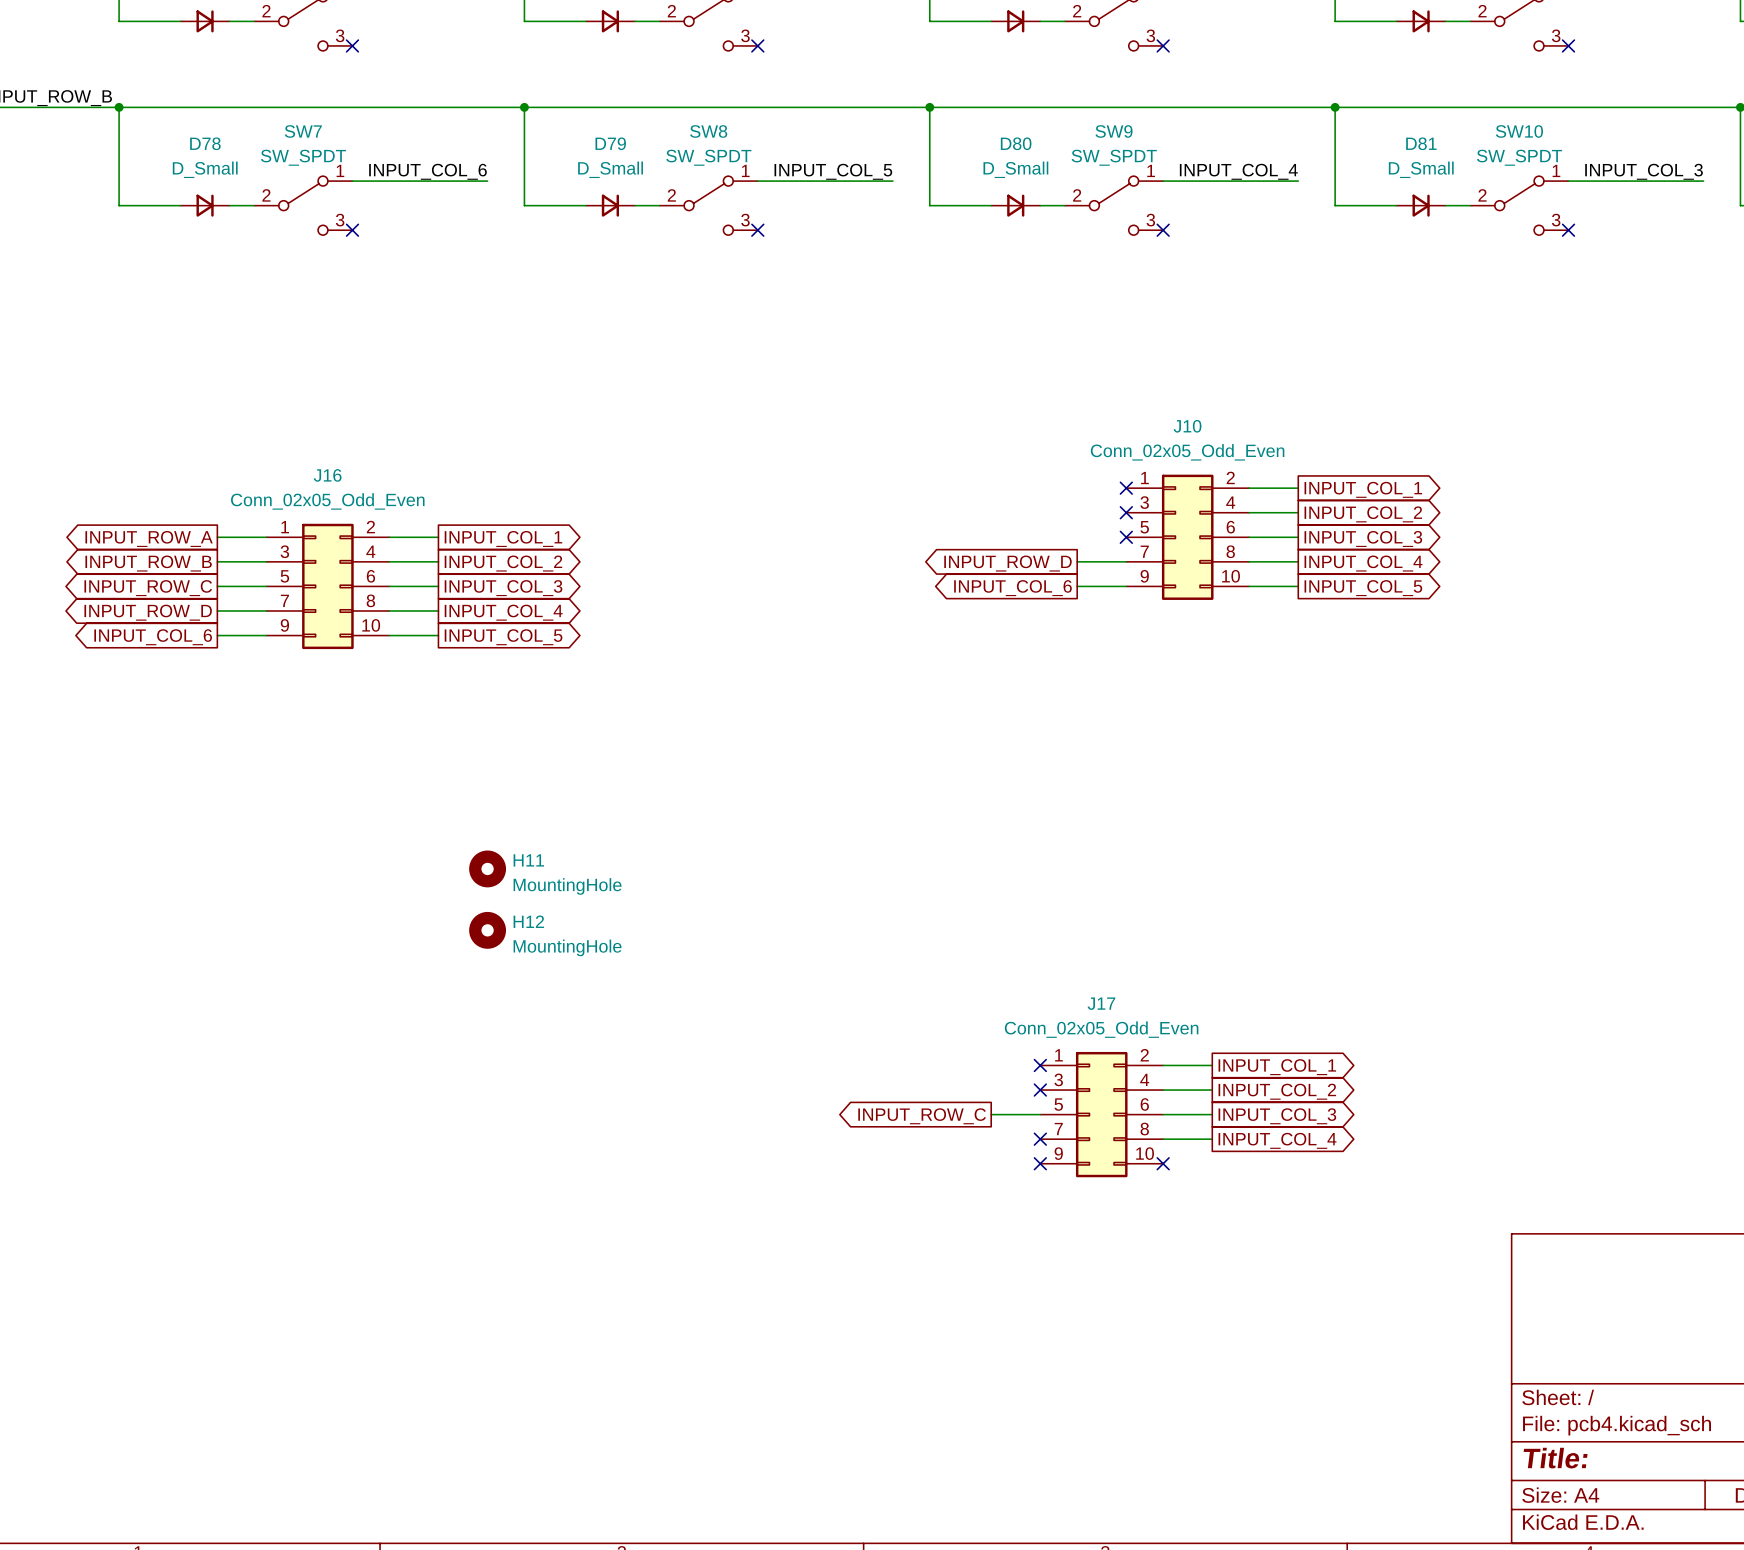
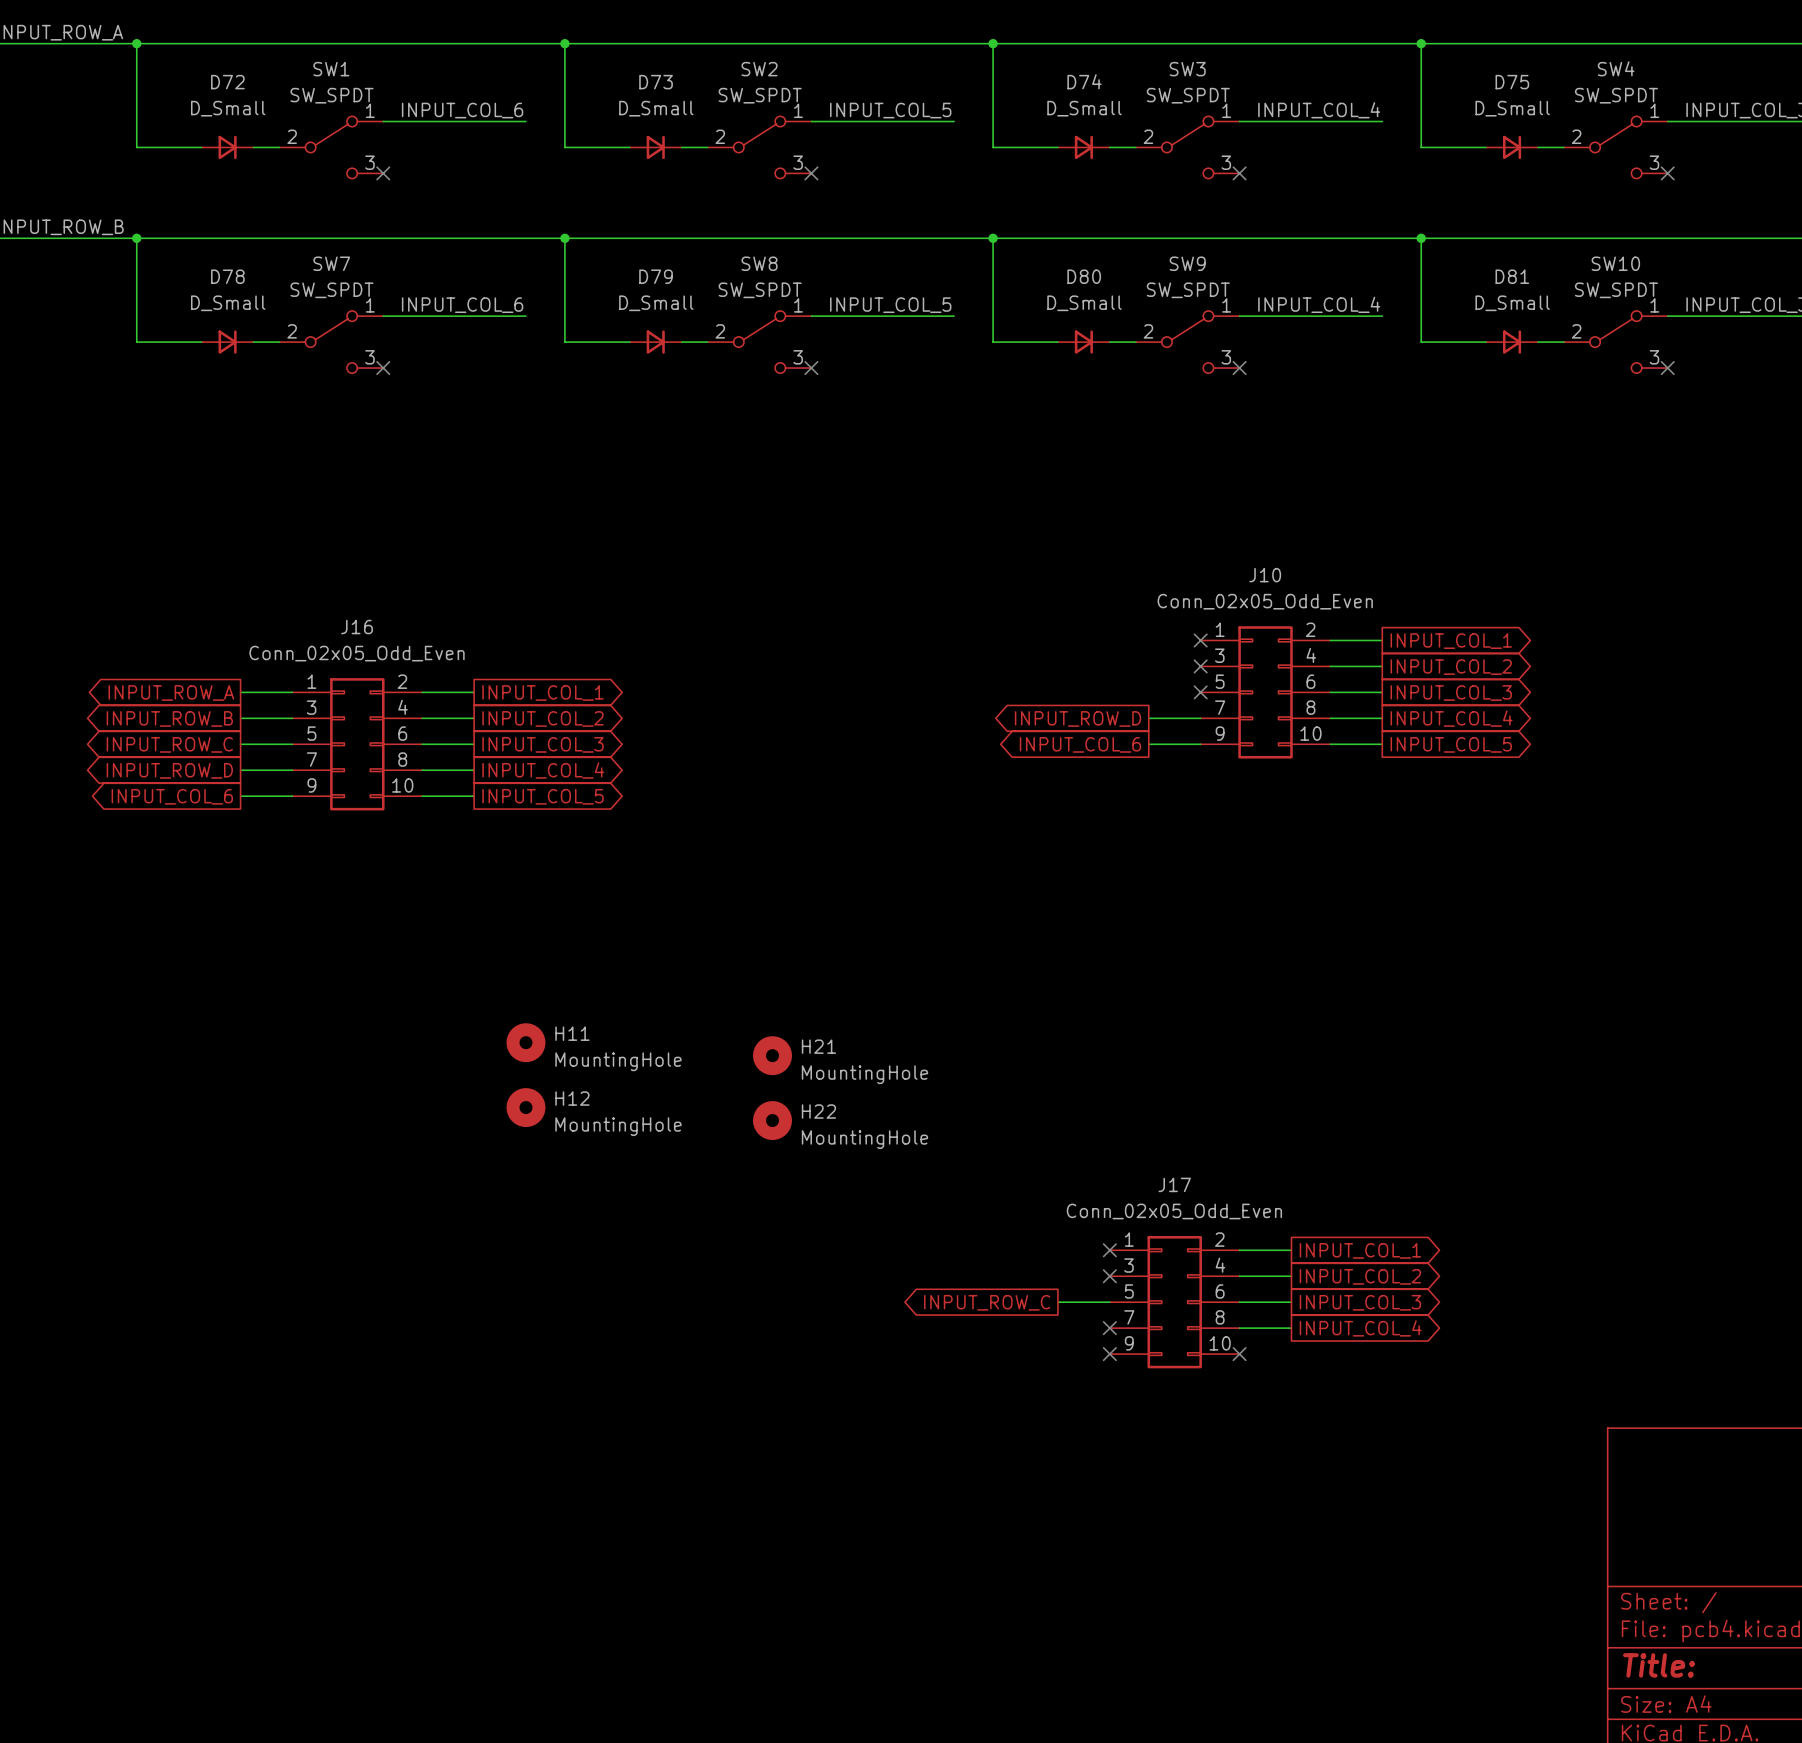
H21: none -> MountingHole (772, 1055)
H22: none -> MountingHole (772, 1120)

